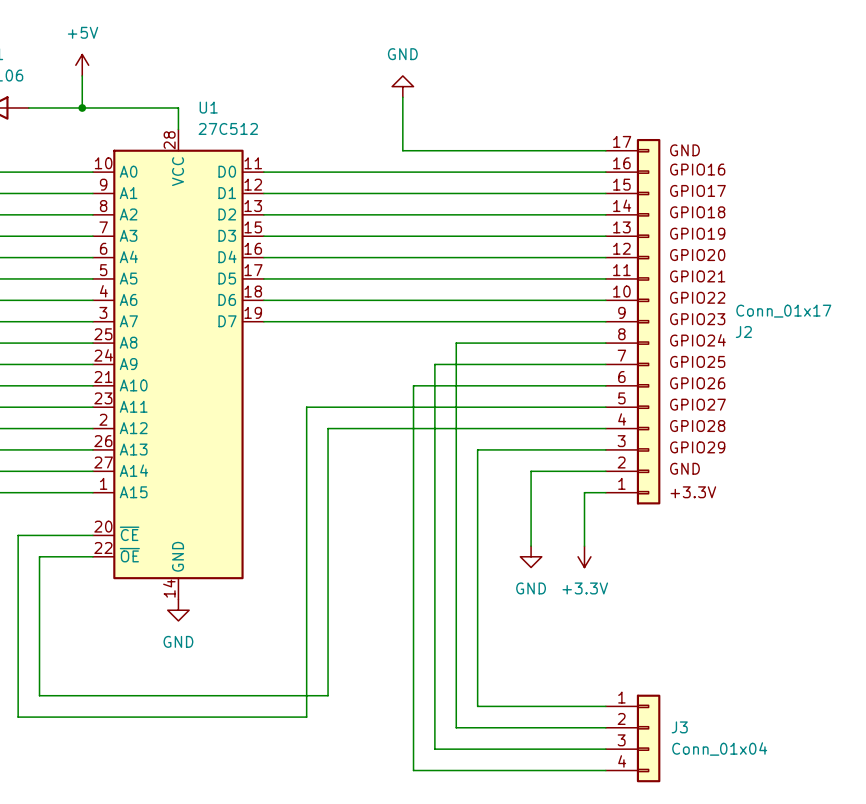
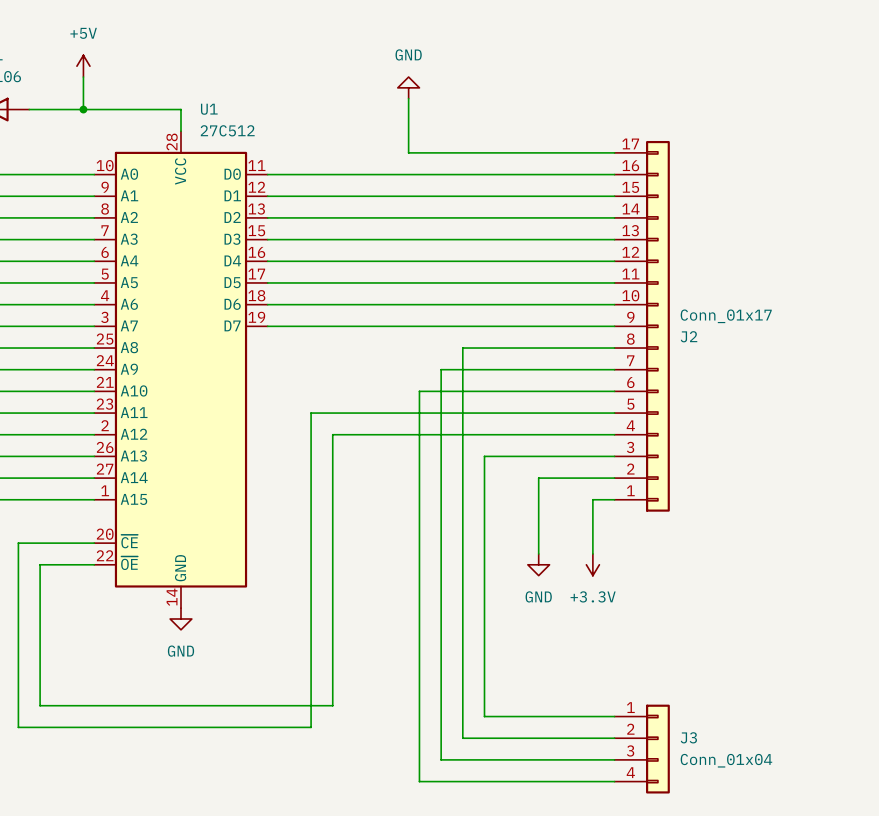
J2 symbol: [605, 138, 661, 505] -> [614, 140, 670, 512]
J2 value position: Conn_01x17 (783, 311) -> Conn_01x17 (726, 316)
J2 name position: J2 (743, 332) -> J2 (689, 336)

